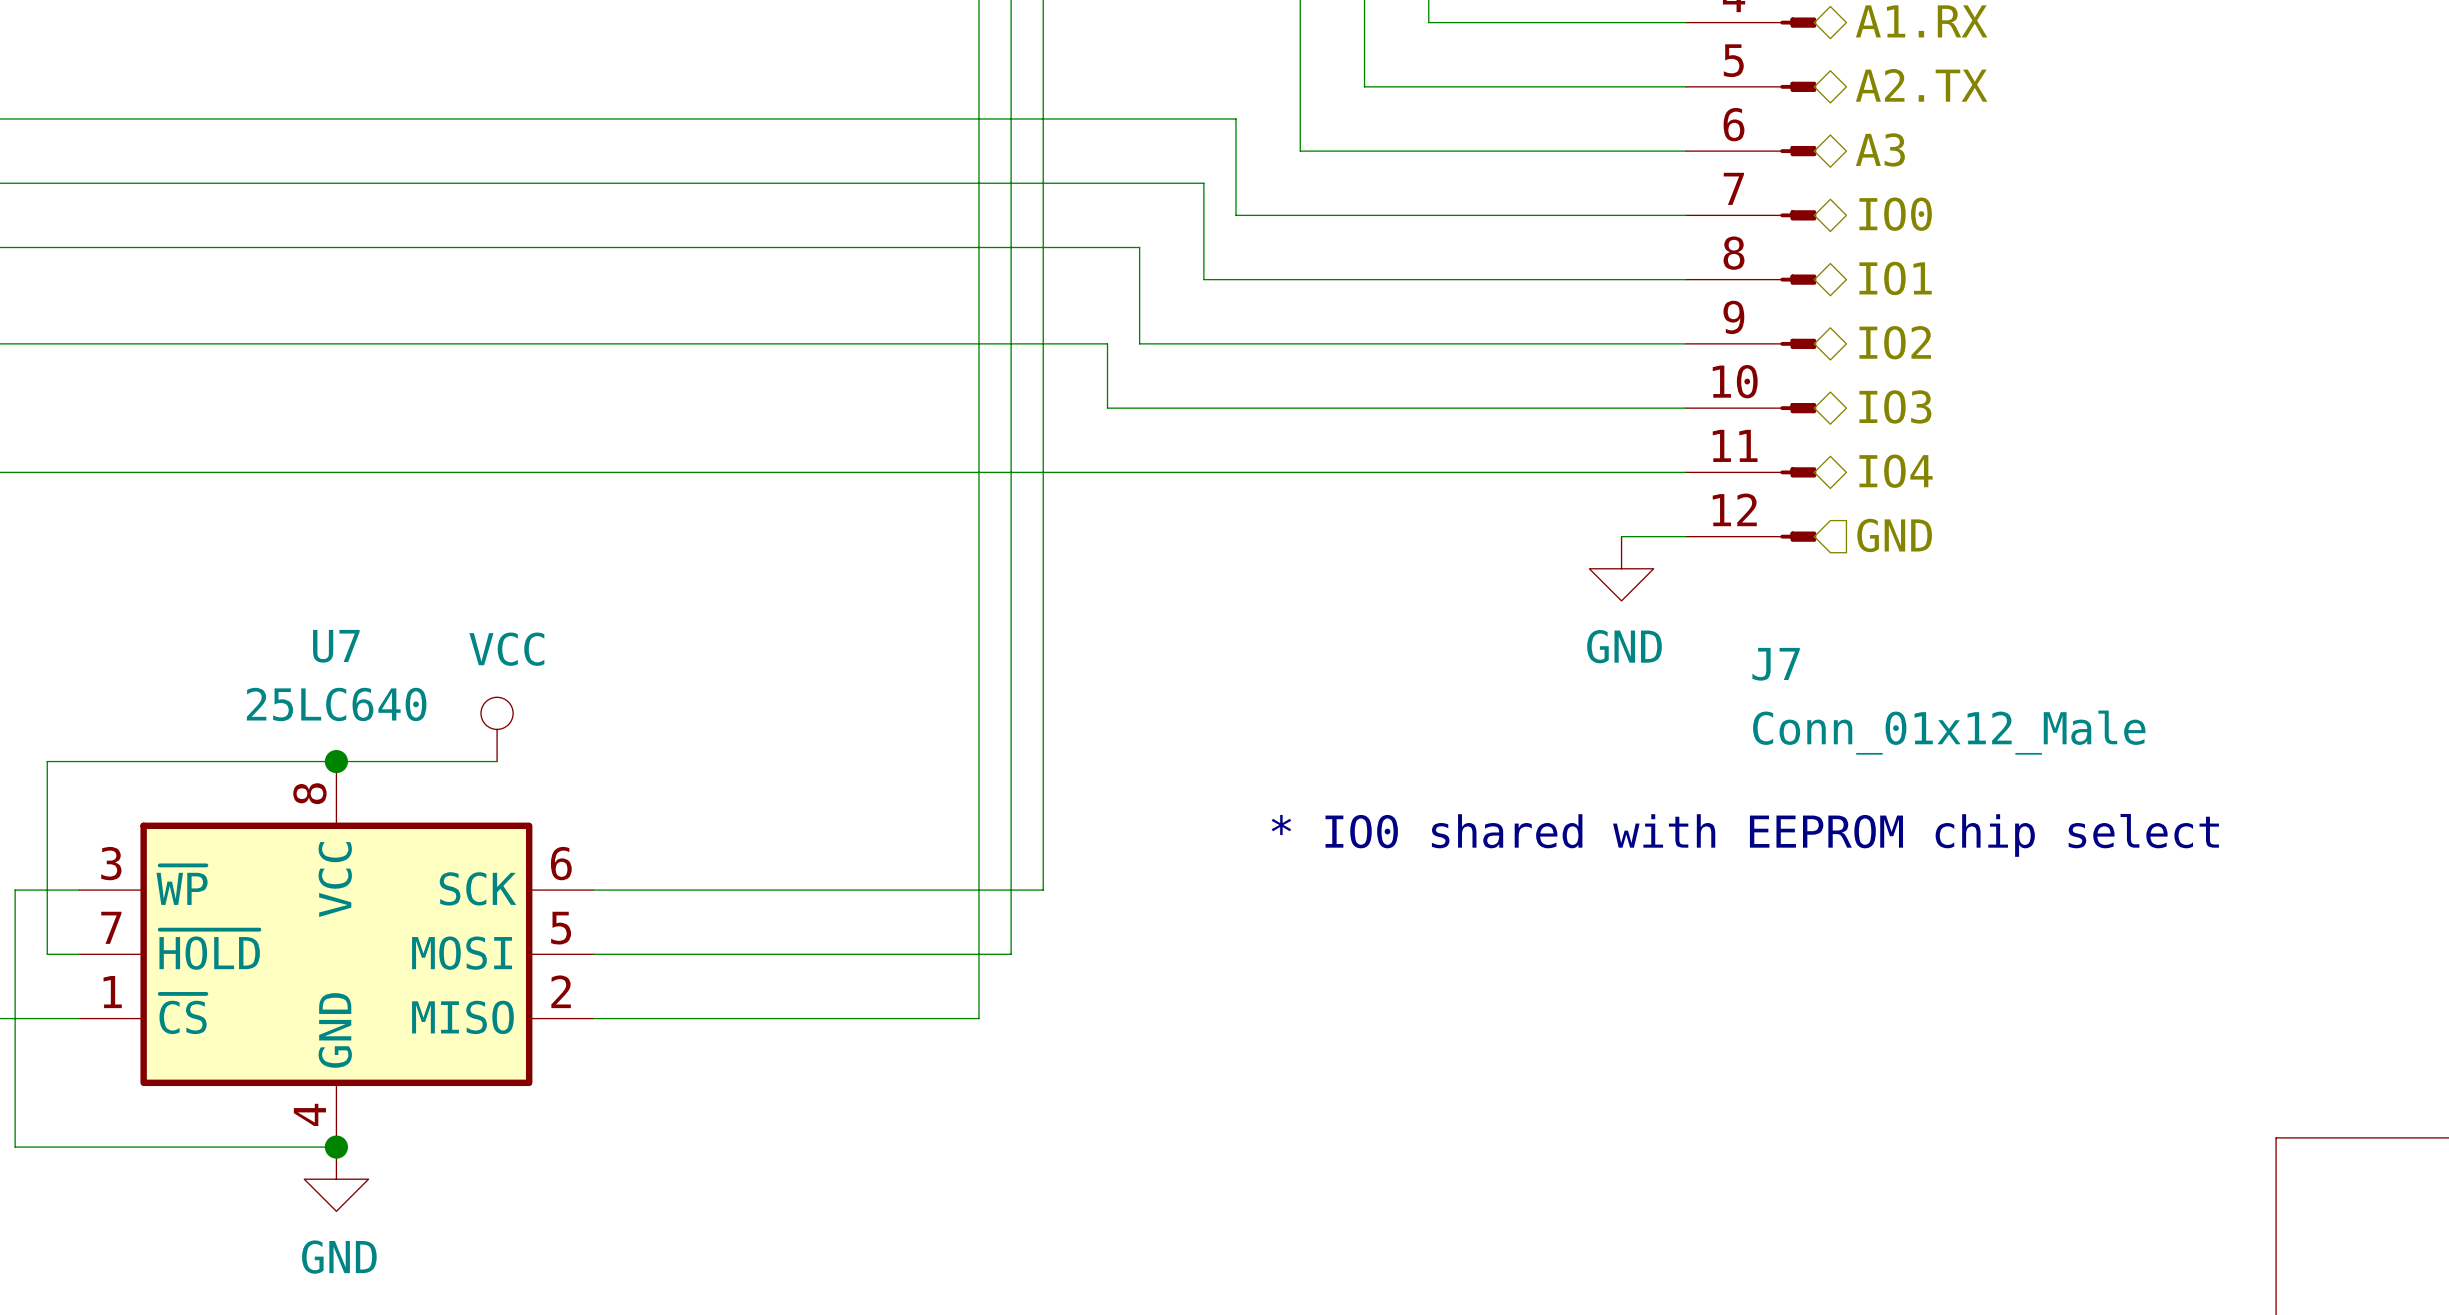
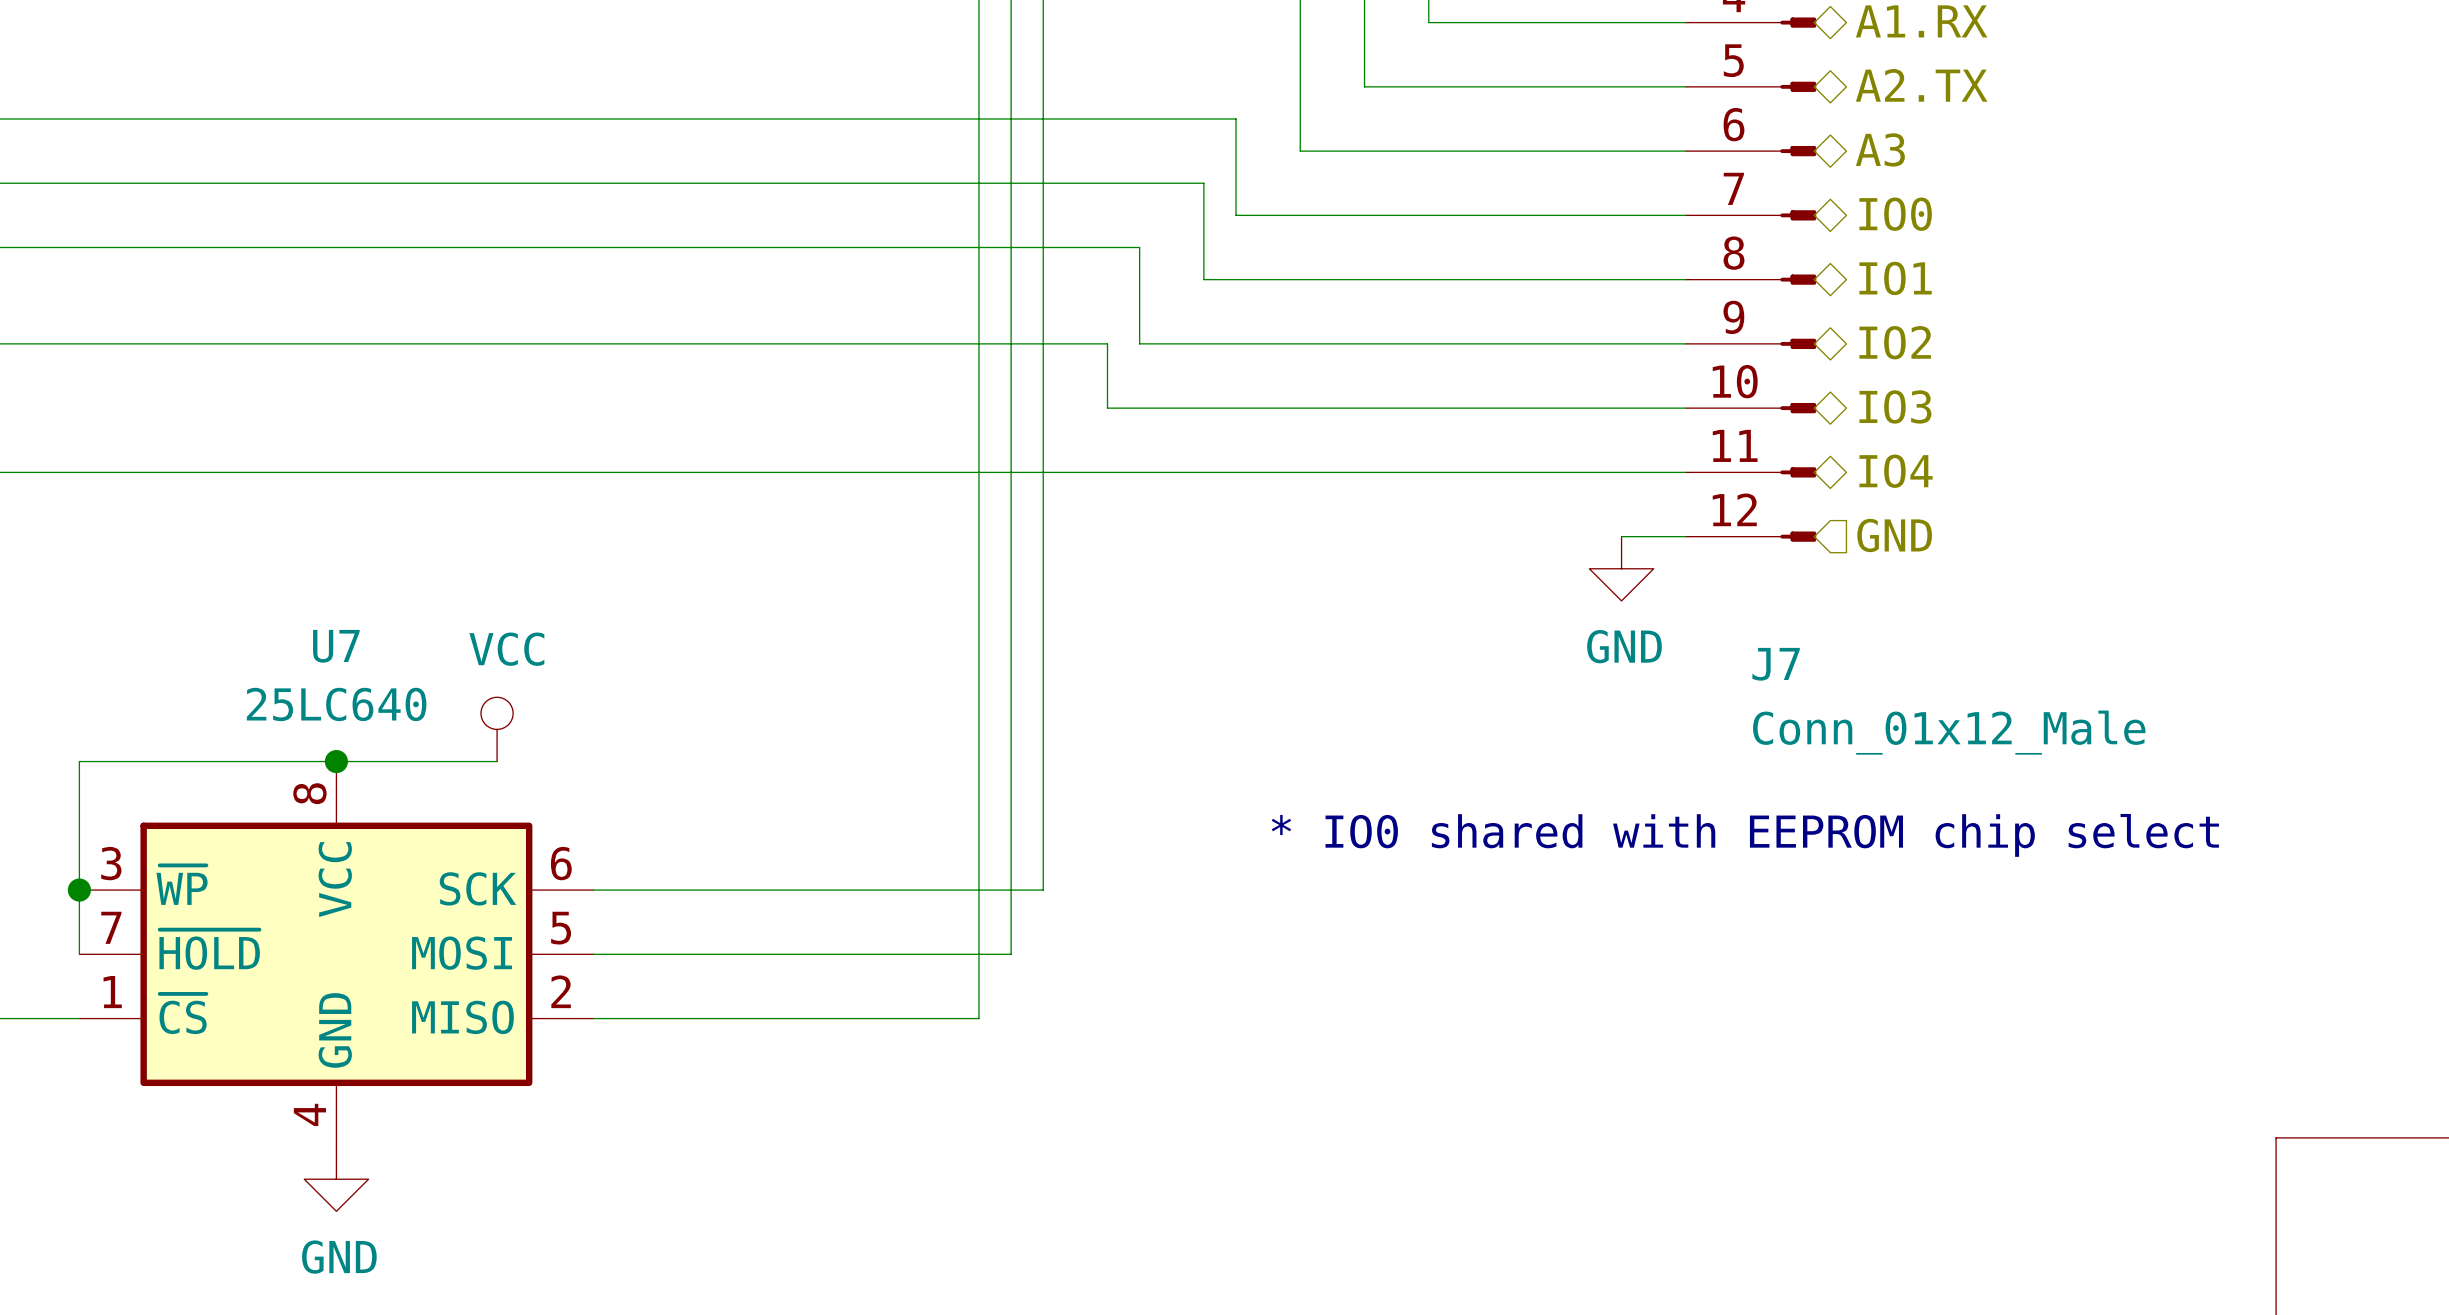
wire: (79, 761) (47, 761) (47, 954) (79, 954) -> (79, 761) (79, 954)
wire: (79, 890) (15, 890) (15, 1147) (336, 1147) -> none
junction: none -> (79, 890)
junction: (336, 1147) -> none

